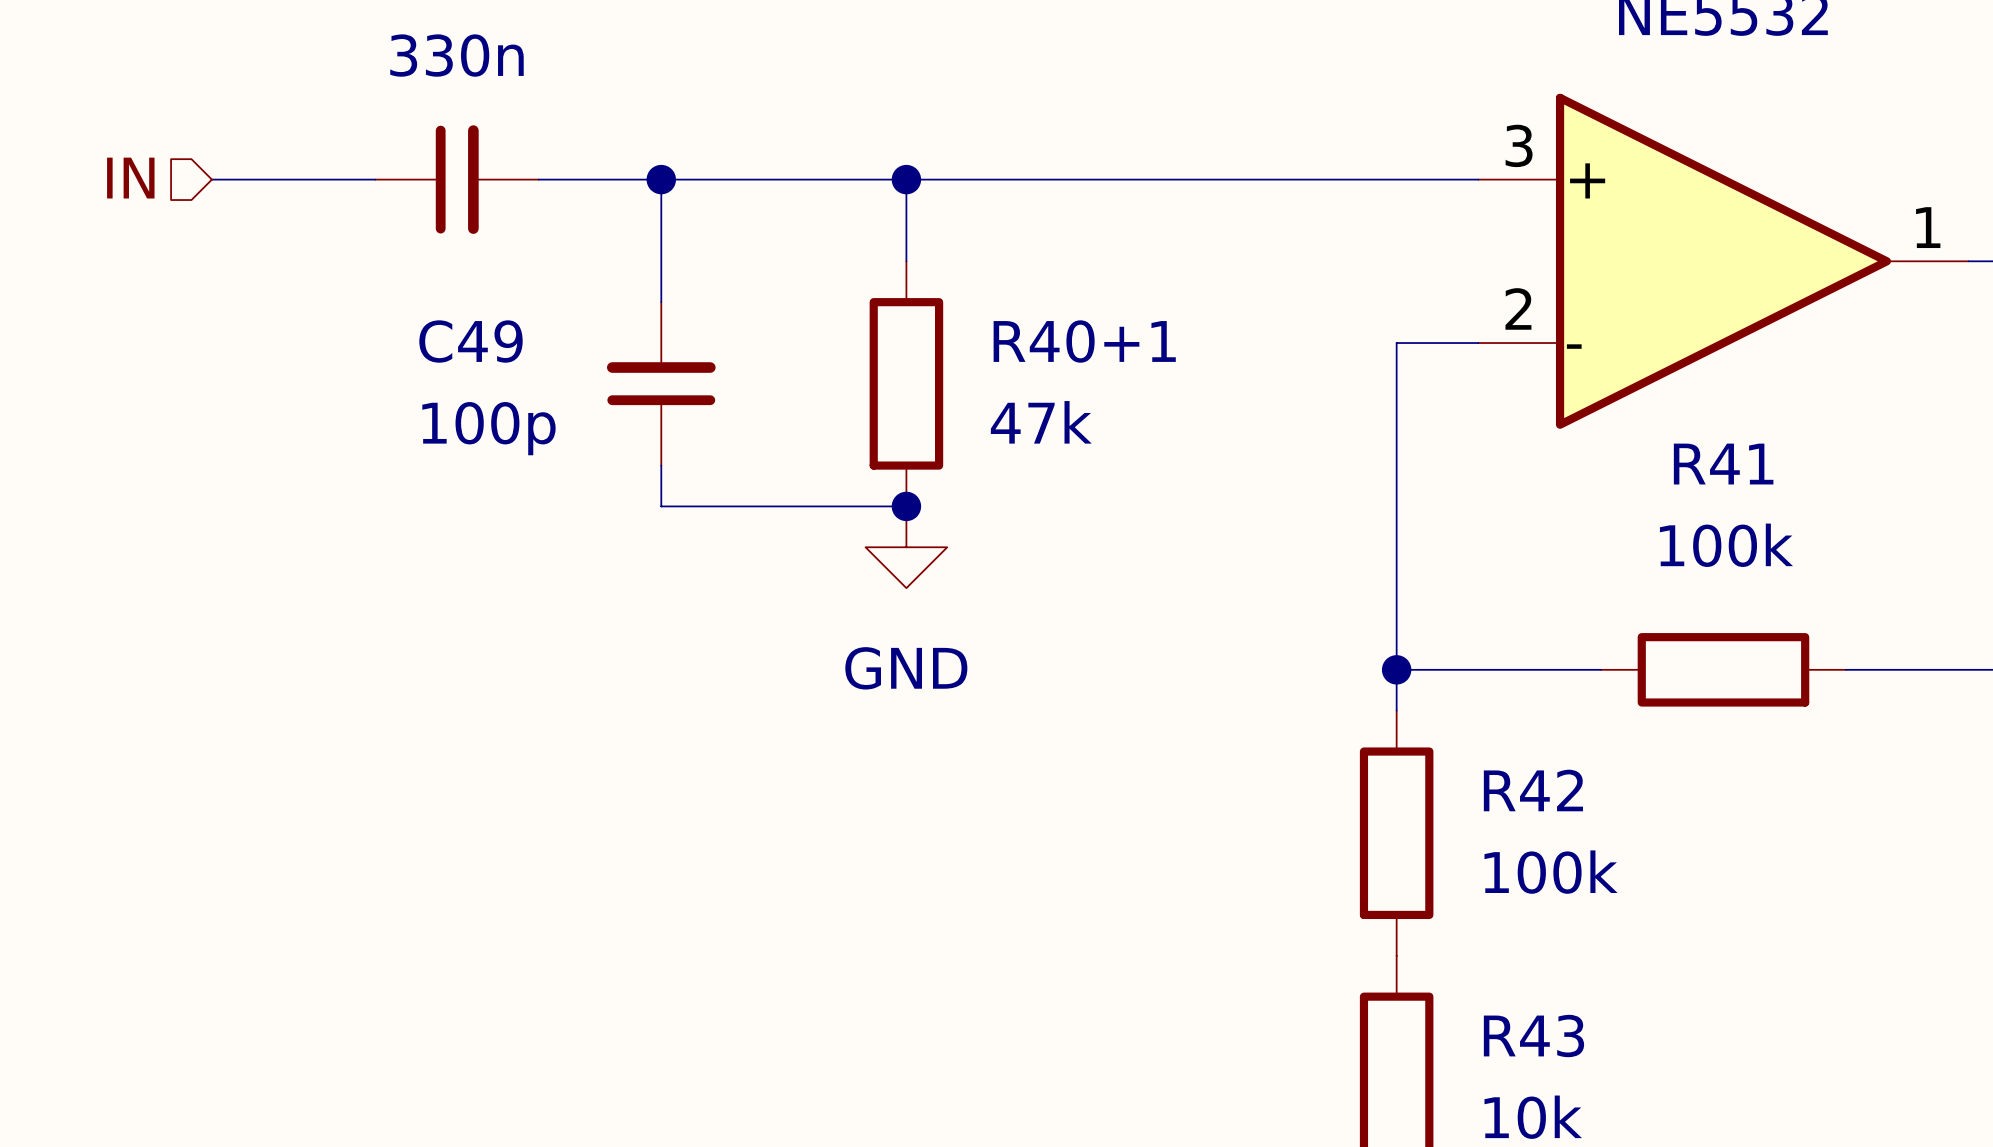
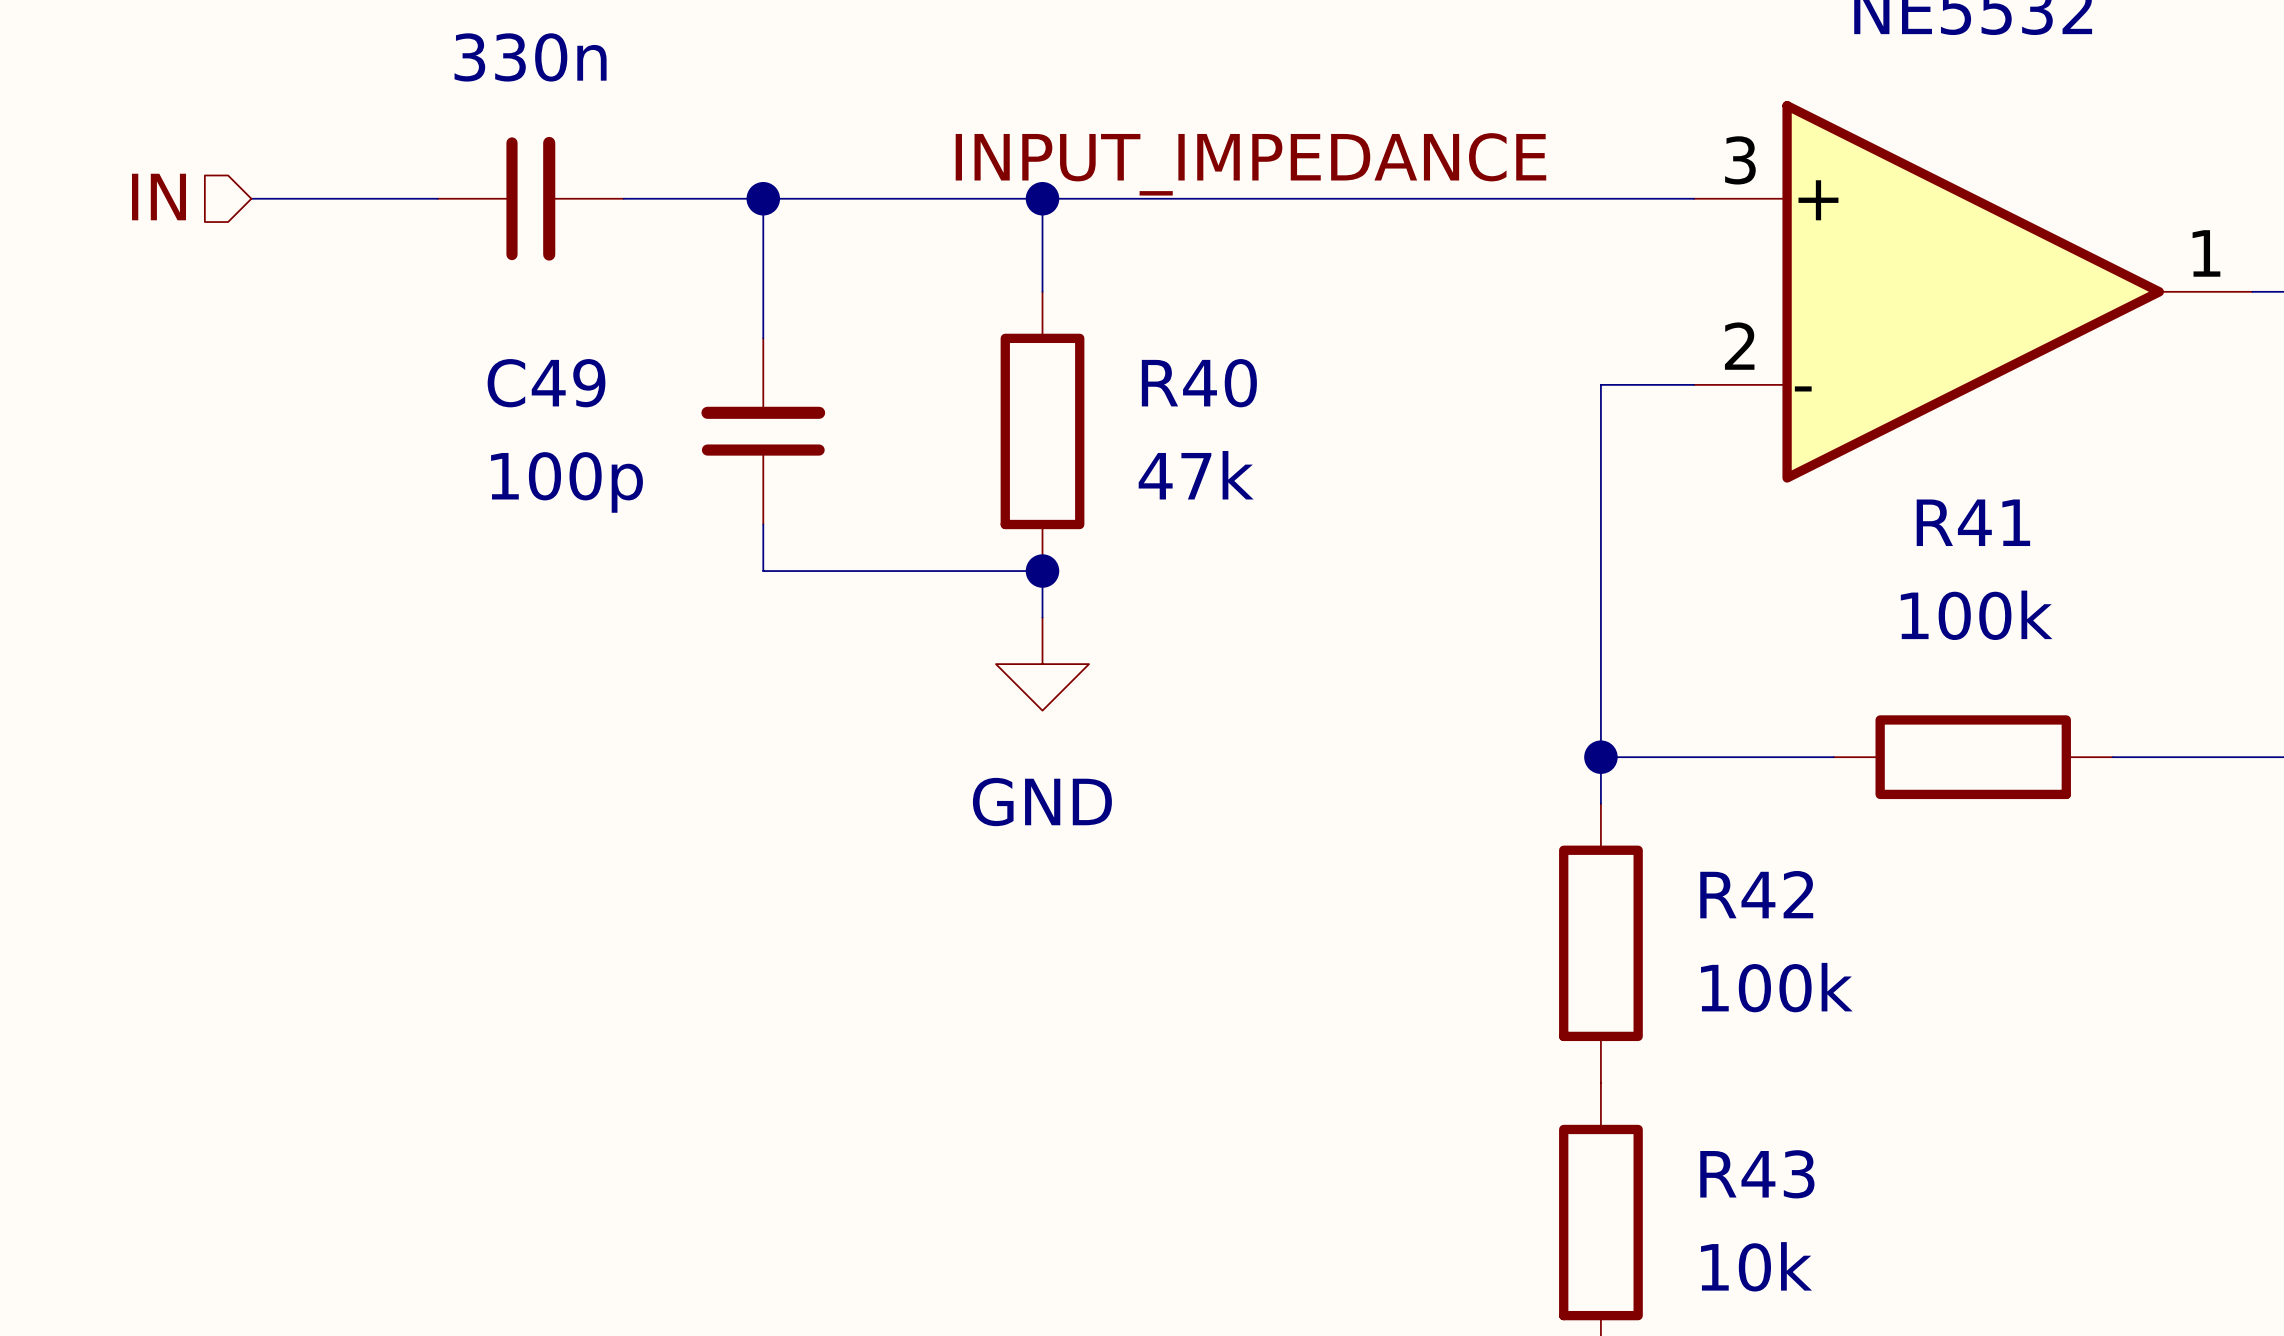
label: none -> INPUT_IMPEDANCE (1250, 164)
R40+1 name: R40+1 (1084, 341) -> R40 (1199, 383)
power symbol position: GND (906, 547) -> GND (1042, 664)

